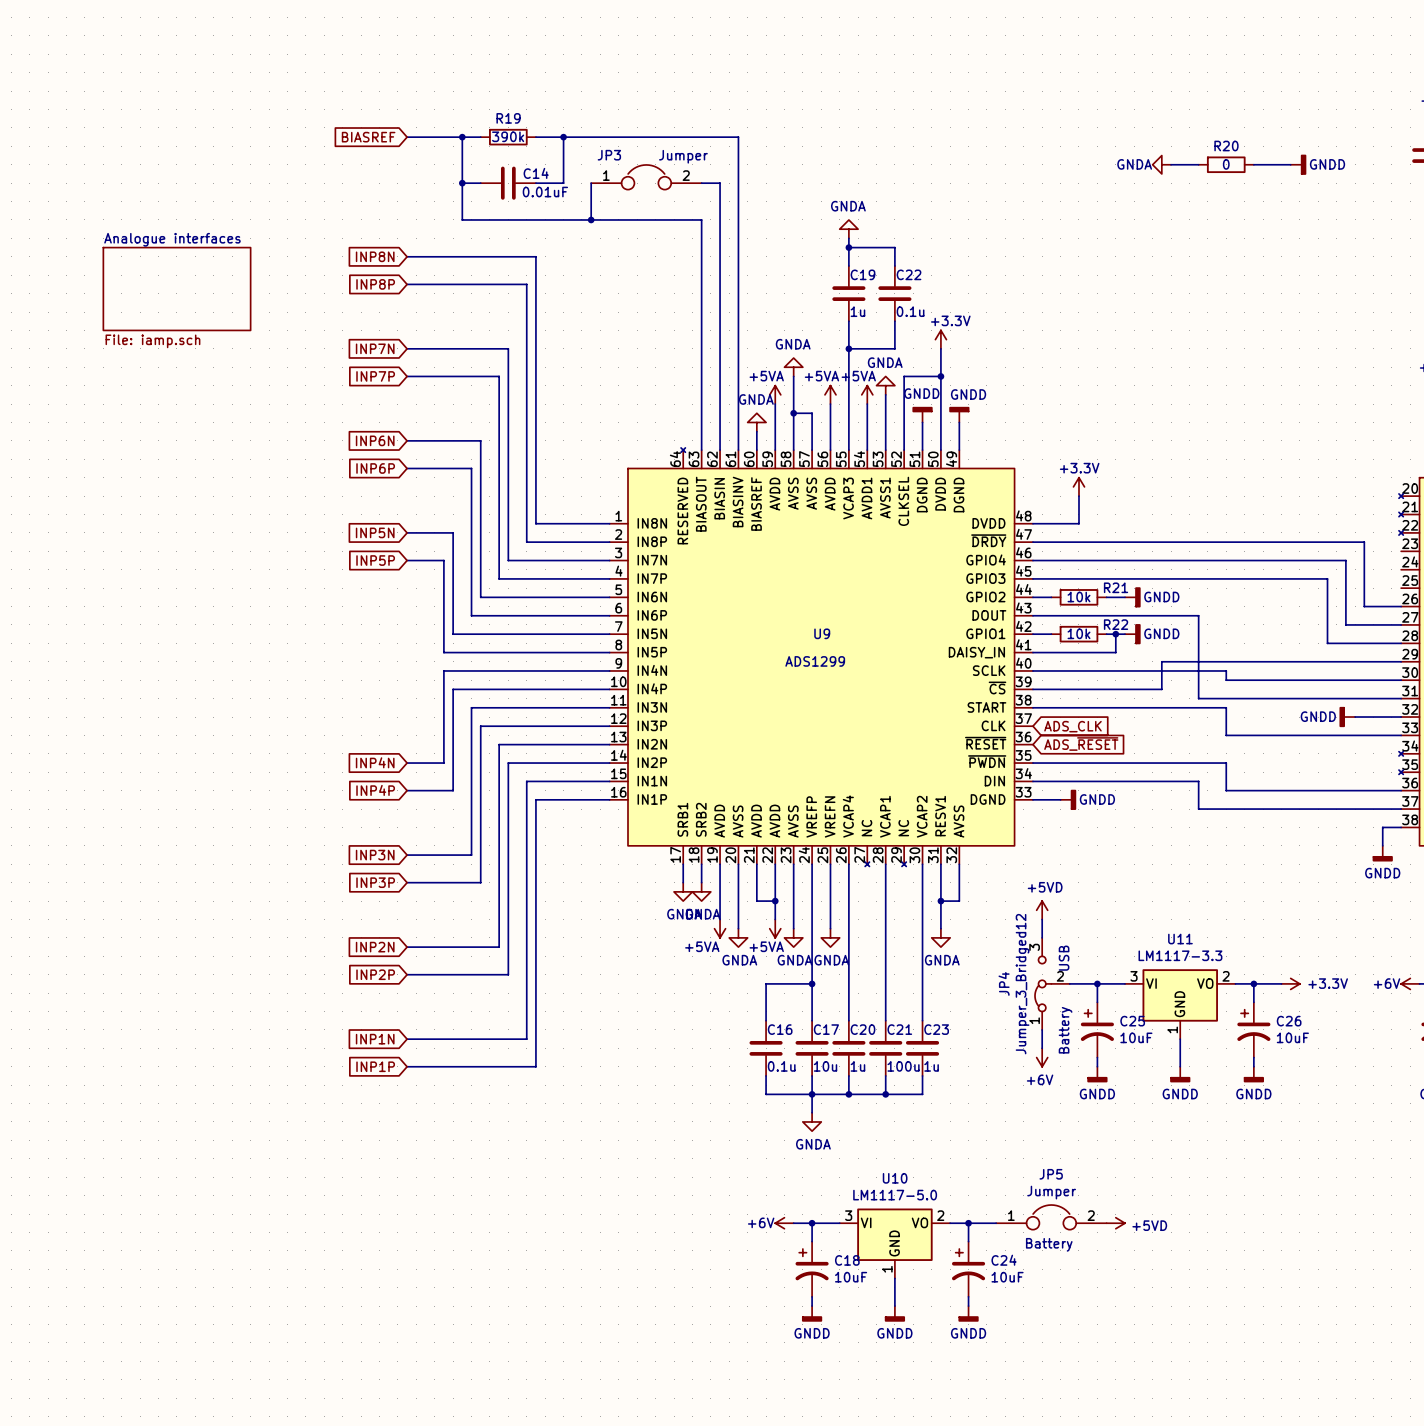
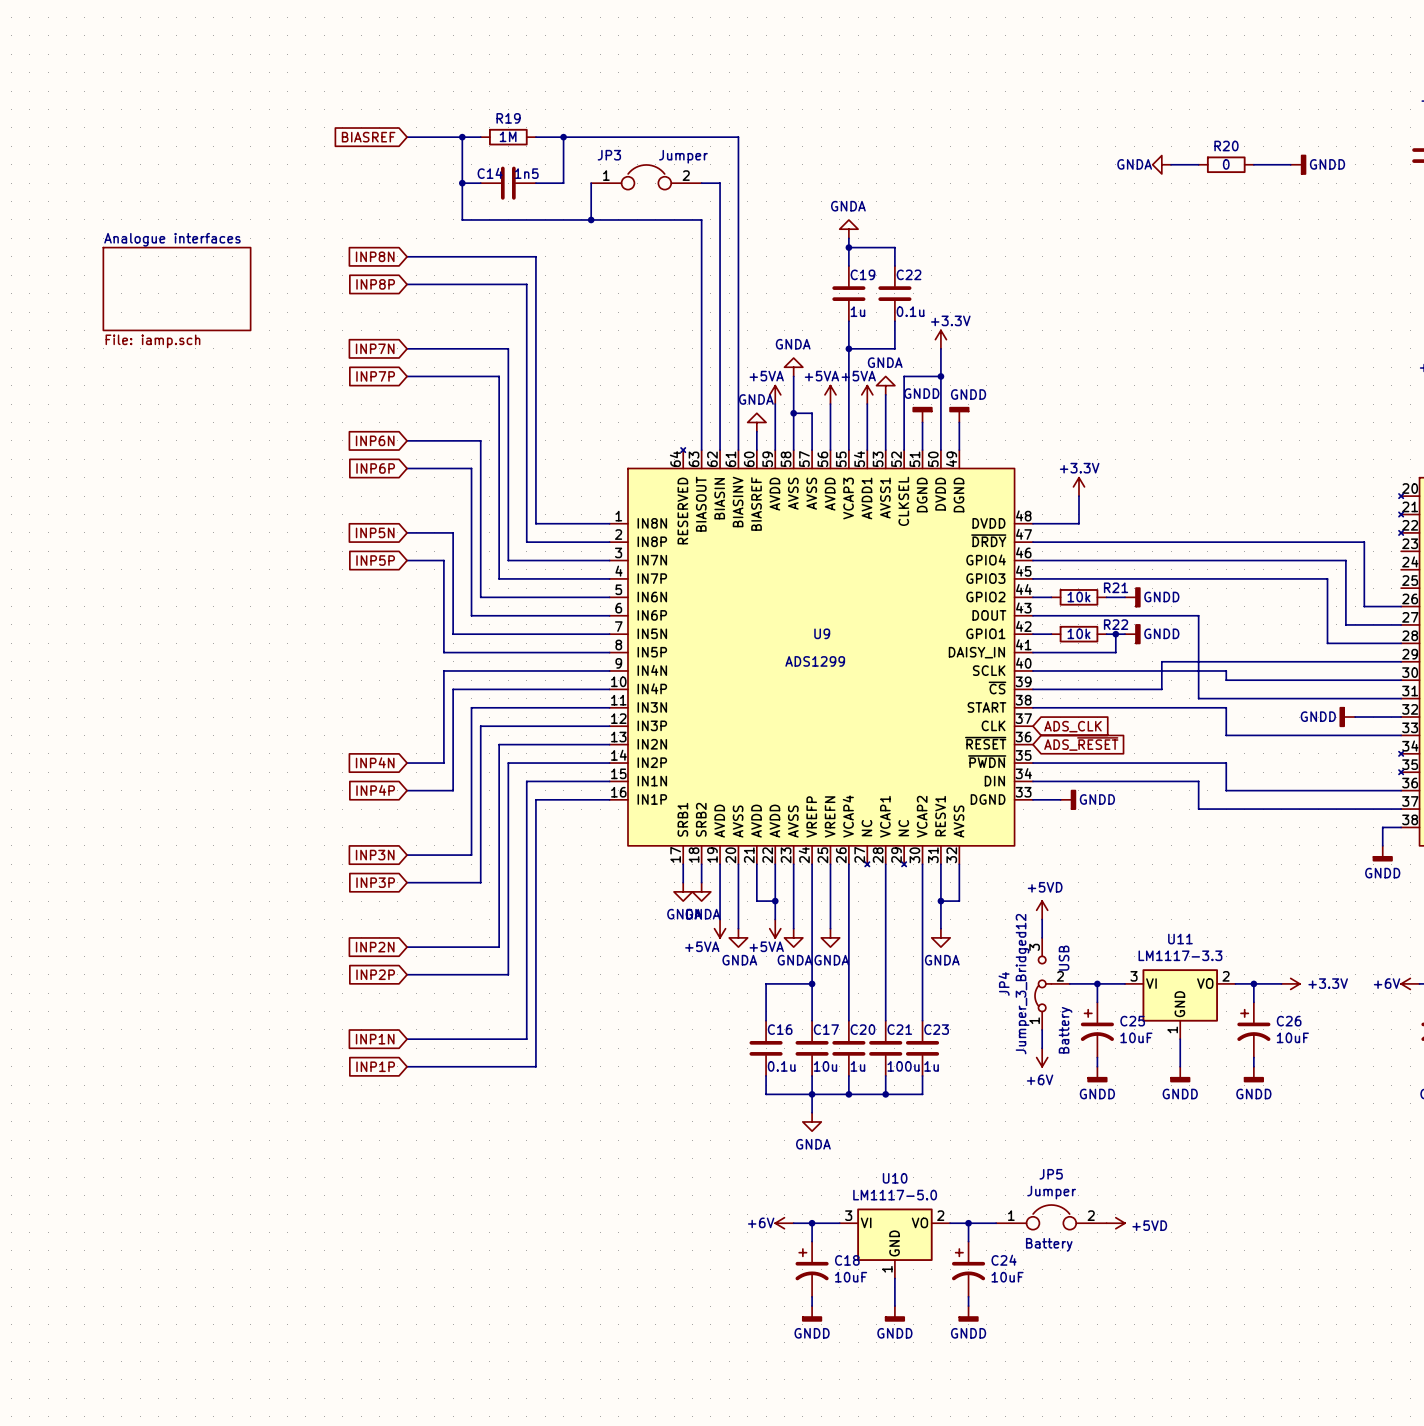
R19 value: 390k (508, 136) -> 1M (508, 136)
C14 name position: C14 (536, 173) -> C14 (490, 173)
C14 value: 0.01uF (545, 192) -> 1n5 (526, 173)

